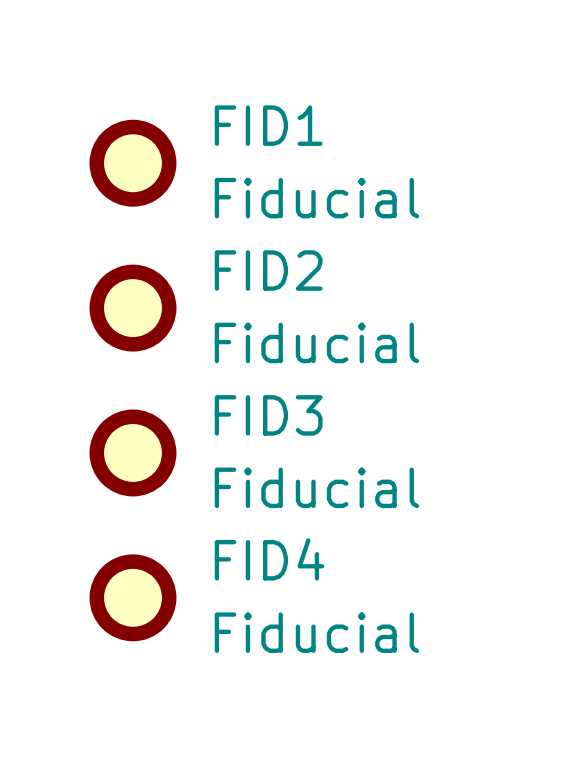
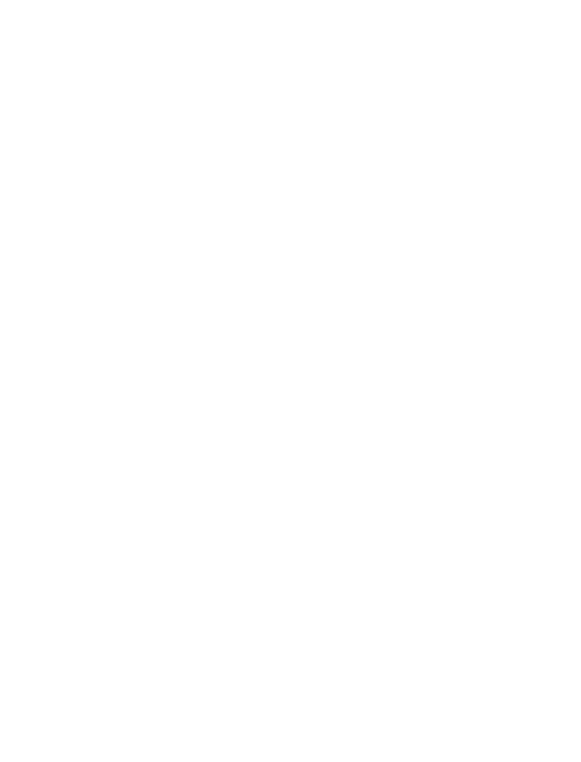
FID1: Fiducial (132, 163) -> none
FID2: Fiducial (132, 308) -> none
FID3: Fiducial (132, 452) -> none
FID4: Fiducial (132, 597) -> none

